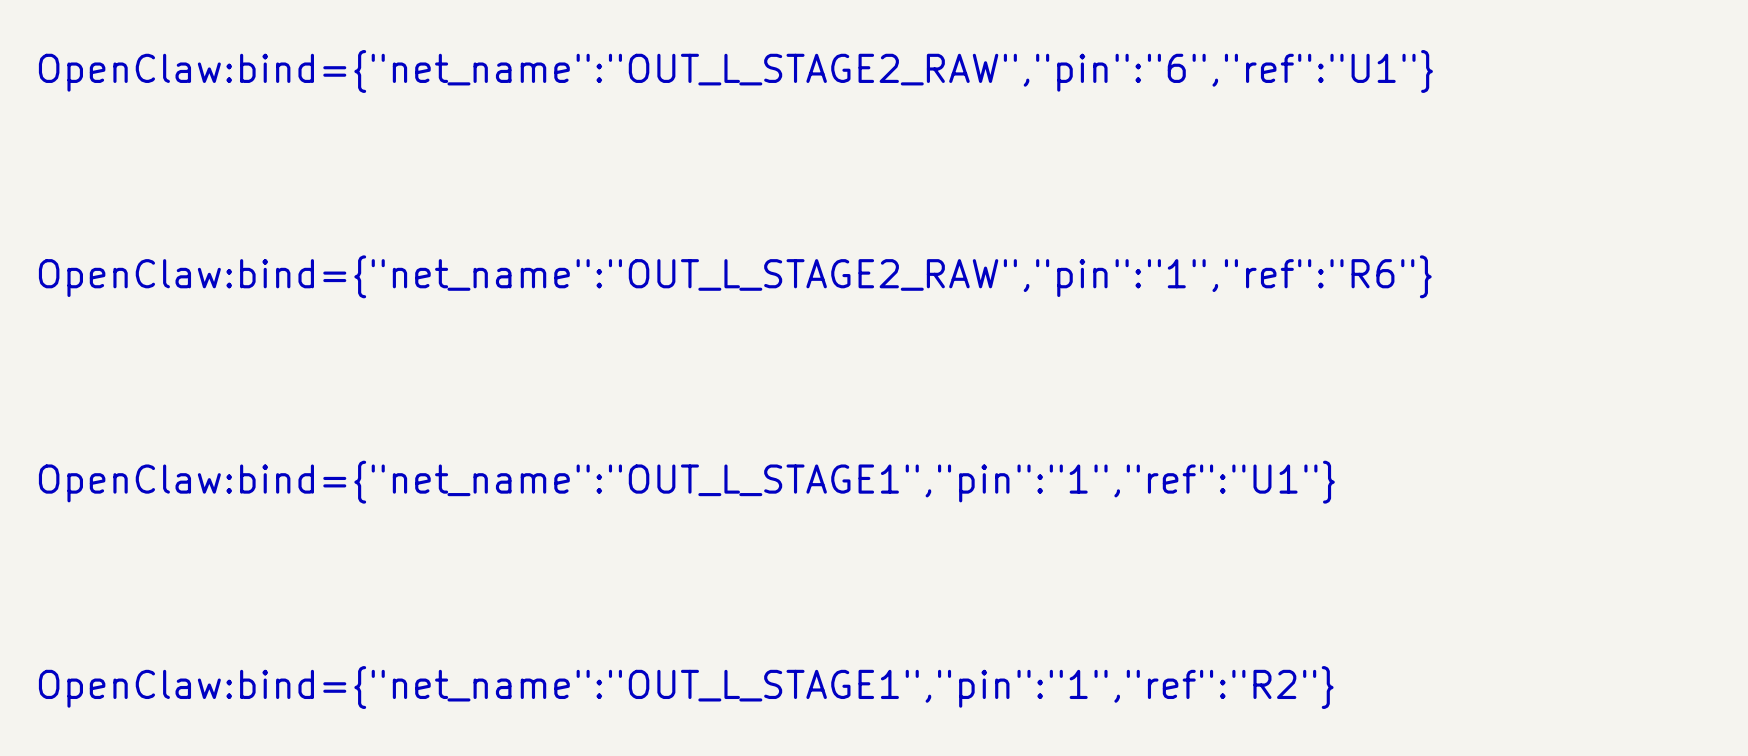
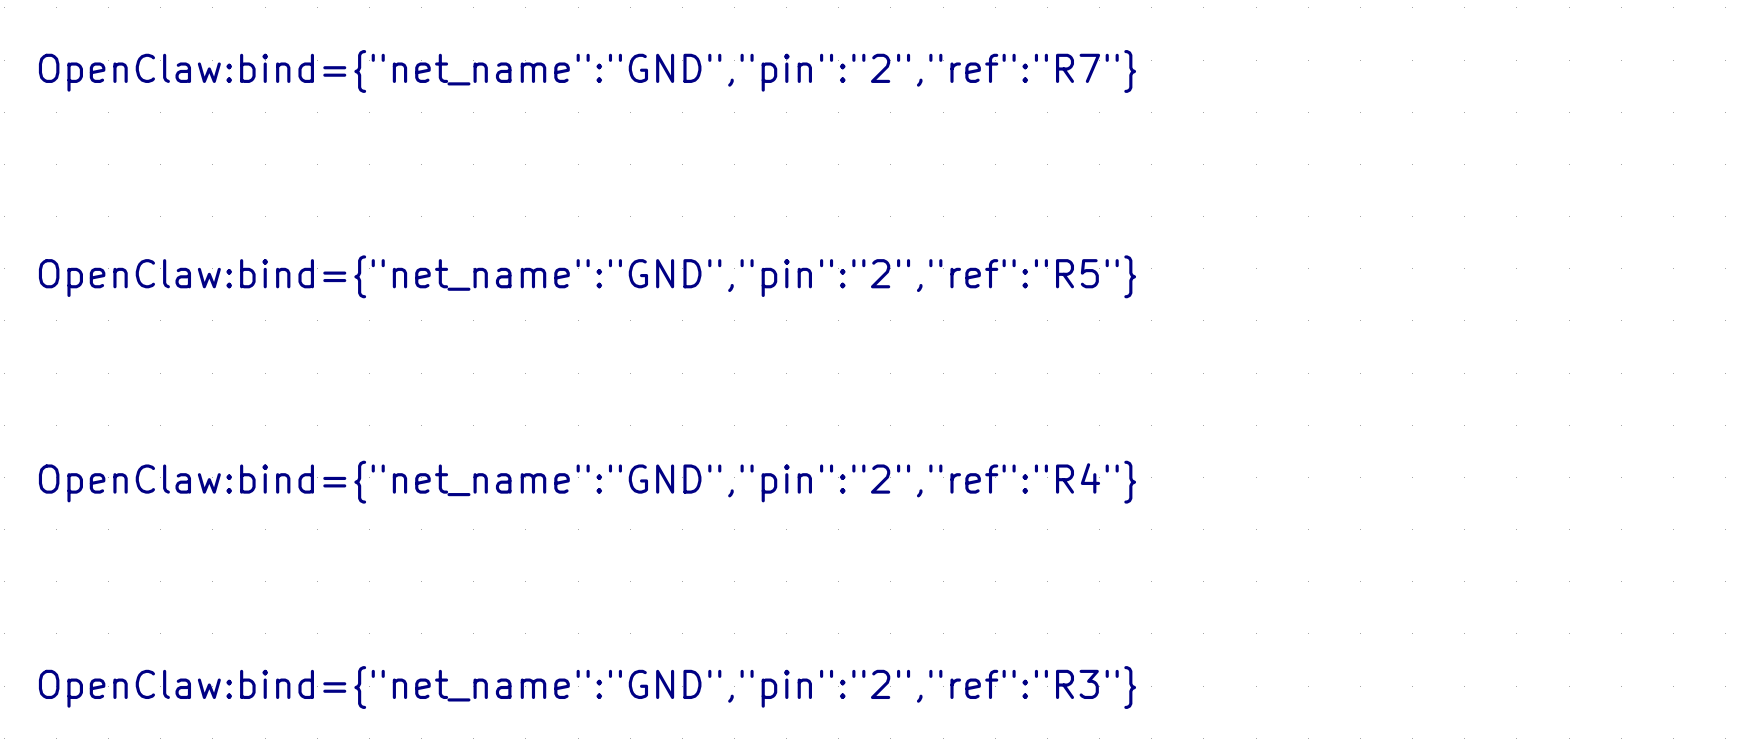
text: OpenClaw:bind={"net_name":"OUT_L_STAGE2_RAW","pin":"6","ref":"U1"} (735, 71) -> OpenClaw:bind={"net_name":"GND","pin":"2","ref":"R7"} (587, 71)
text: OpenClaw:bind={"net_name":"OUT_L_STAGE2_RAW","pin":"1","ref":"R6"} (735, 276) -> OpenClaw:bind={"net_name":"GND","pin":"2","ref":"R5"} (587, 276)
text: OpenClaw:bind={"net_name":"OUT_L_STAGE1","pin":"1","ref":"U1"} (686, 482) -> OpenClaw:bind={"net_name":"GND","pin":"2","ref":"R4"} (587, 482)
text: OpenClaw:bind={"net_name":"OUT_L_STAGE1","pin":"1","ref":"R2"} (686, 687) -> OpenClaw:bind={"net_name":"GND","pin":"2","ref":"R3"} (587, 687)

